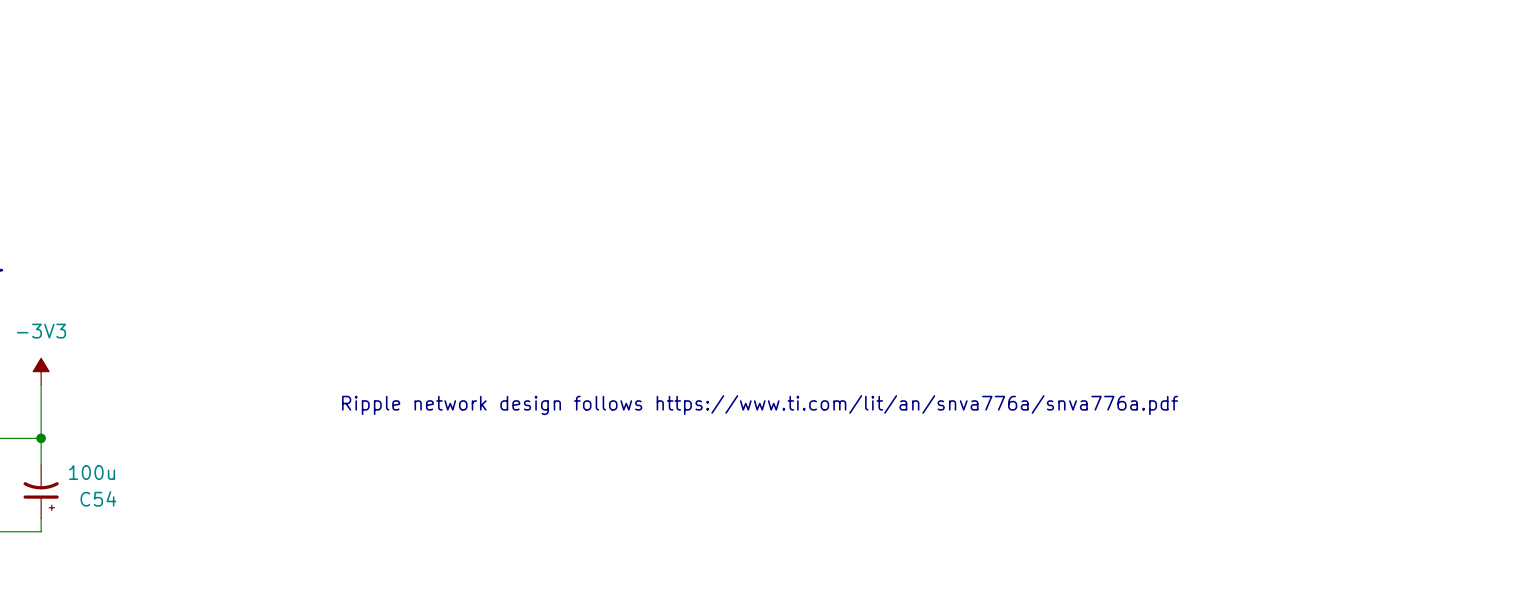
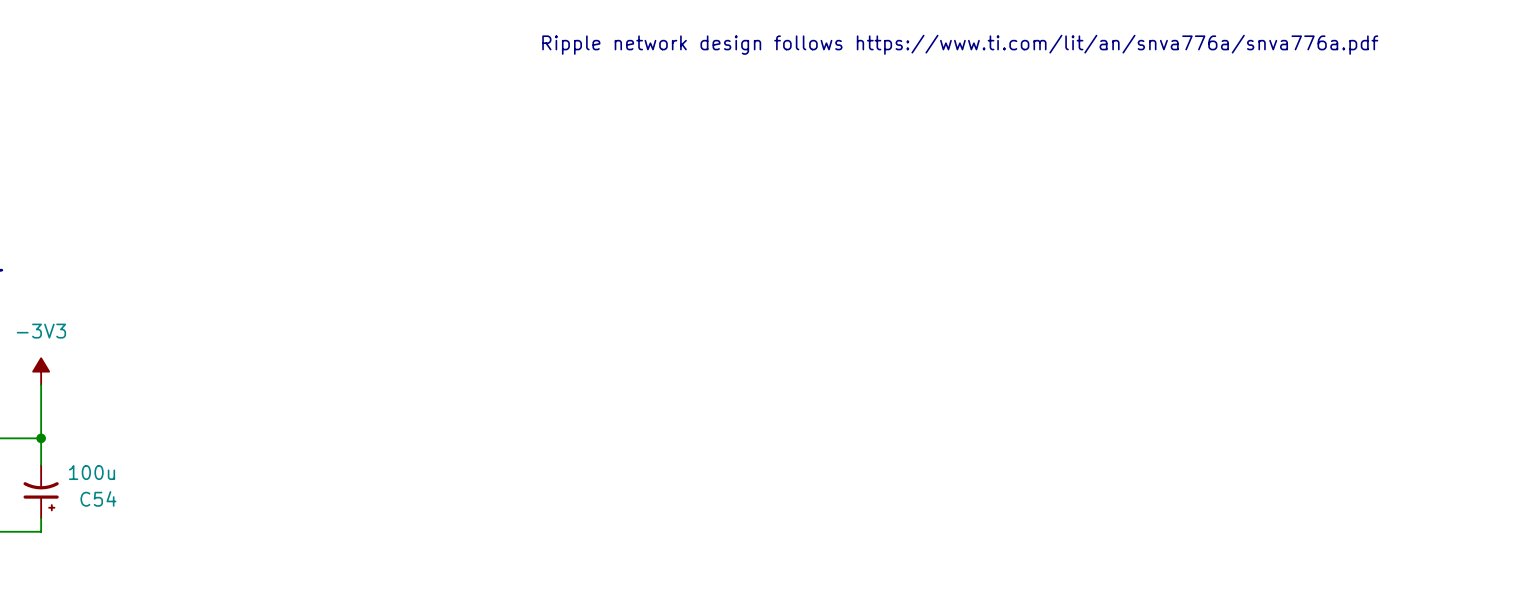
text: none -> Ripple network design follows https://www.ti.com/lit/an/snva776a/snva776a.pdf (960, 44)
text: Ripple network design follows https://www.ti.com/lit/an/snva776a/snva776a.pdf (760, 405) -> none

